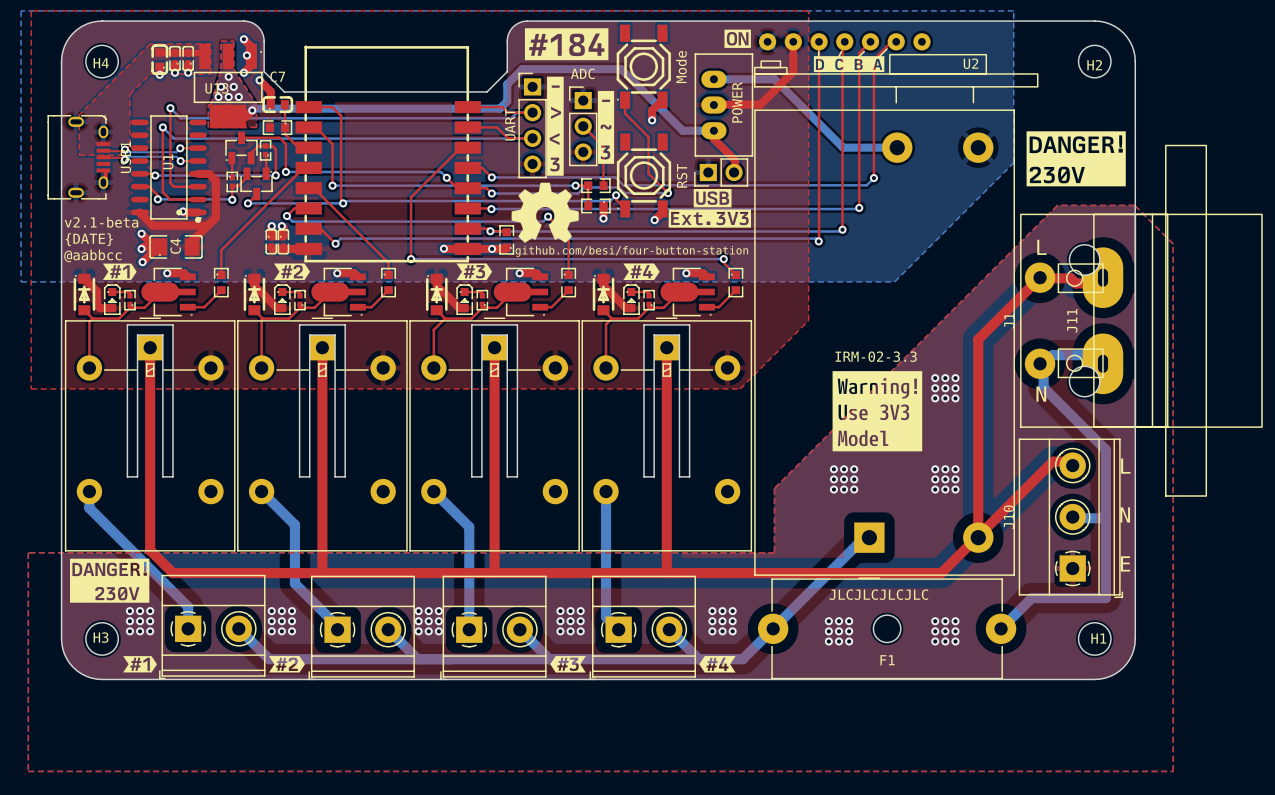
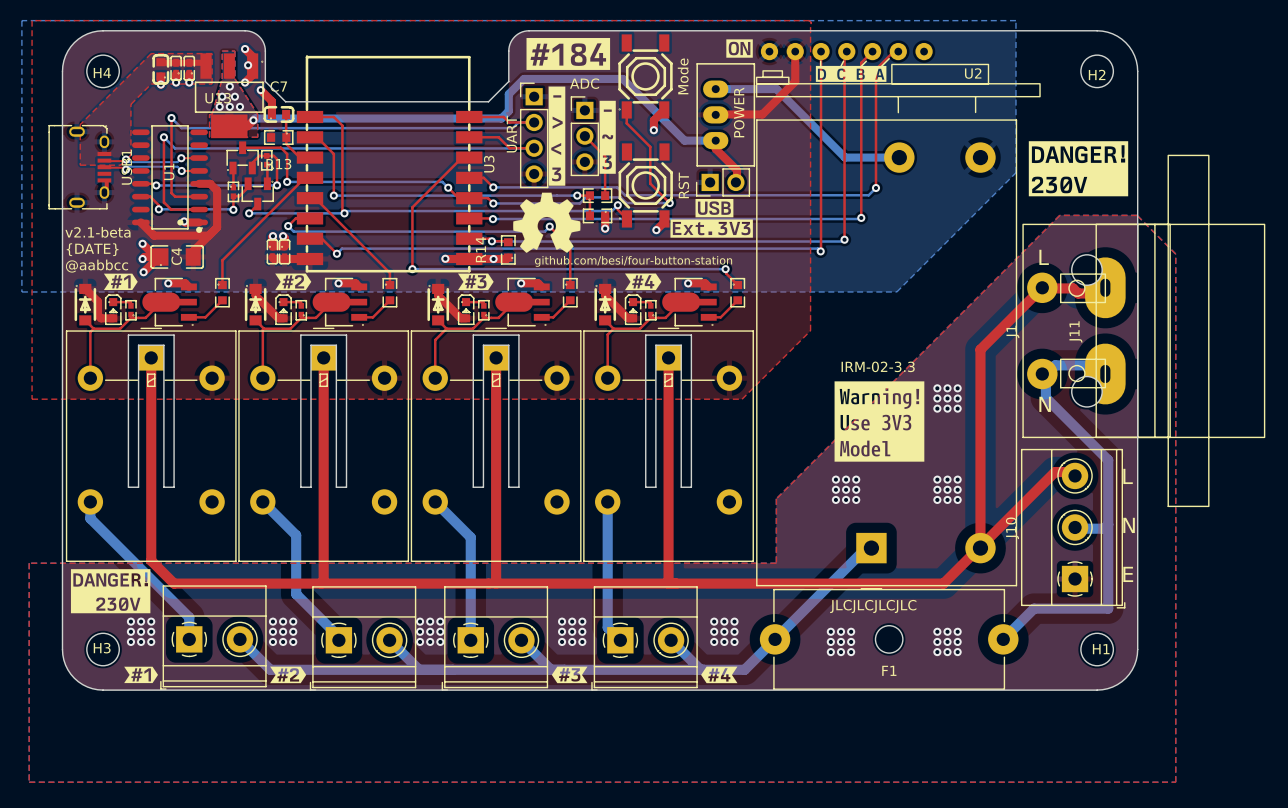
R13 name: none -> R13 (278, 164)
U3 name: none -> U3 (489, 164)
R14 name: none -> R14 (480, 249)

